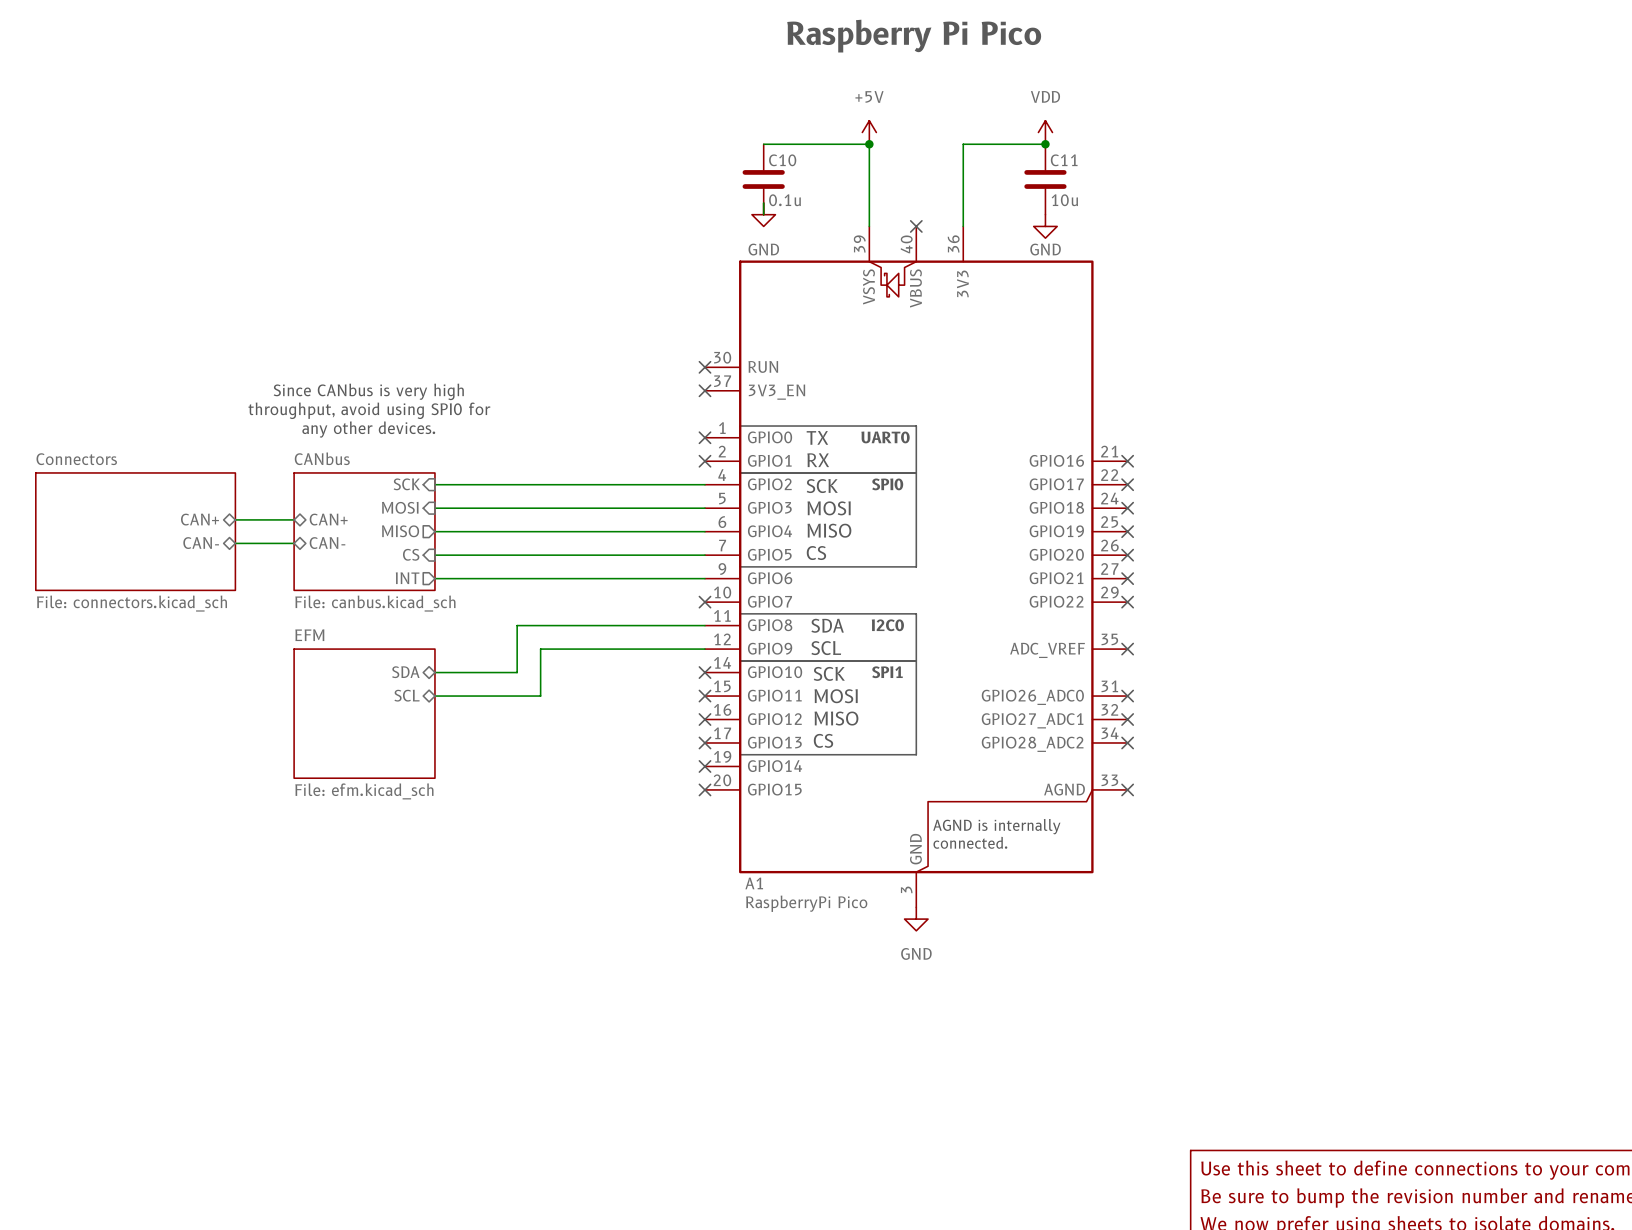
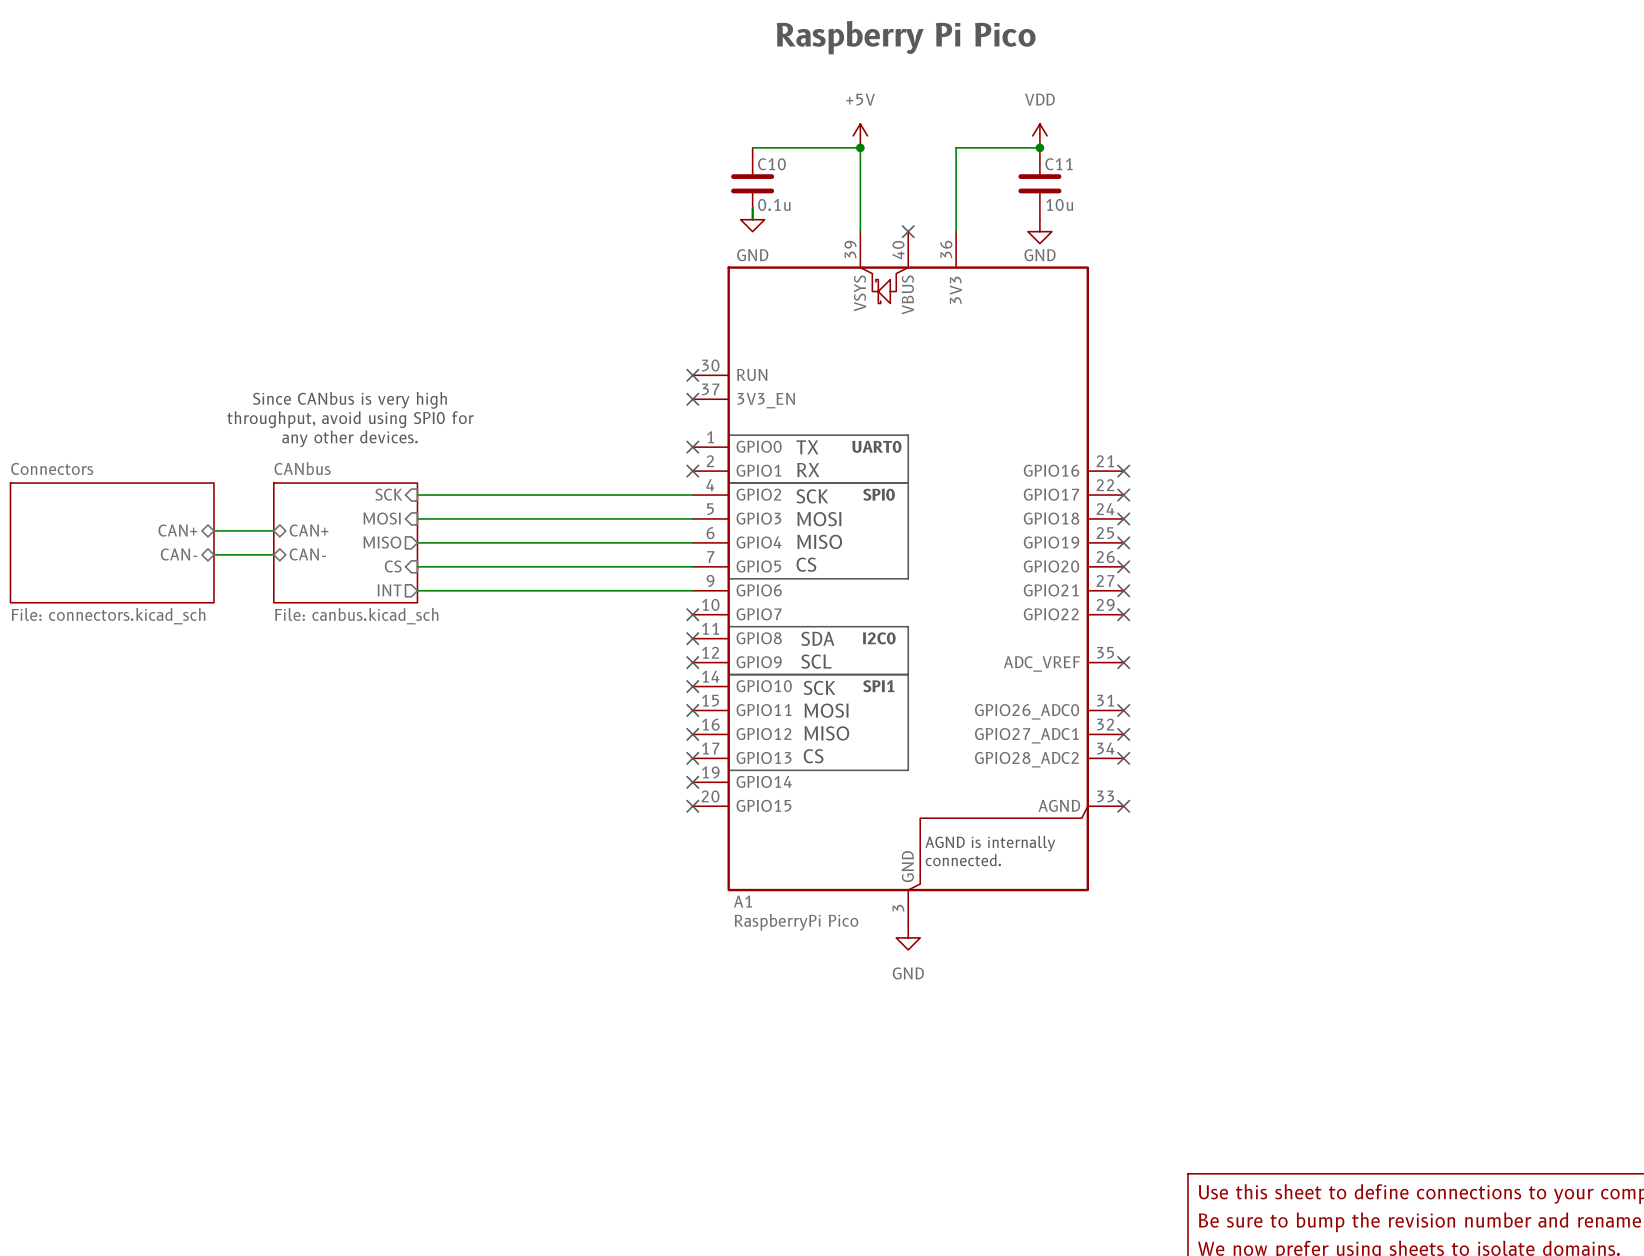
wire: (704, 625) (517, 625) (517, 672) (434, 672) -> none
no-connect mark: none -> (692, 638)
wire: (704, 649) (540, 649) (540, 696) (434, 696) -> none
no-connect mark: none -> (692, 662)
sheet pin: SDA (405, 672) -> none
sheet pin: SCL (407, 695) -> none
sheet EFM: File: efm.kicad_sch (364, 713) -> none

